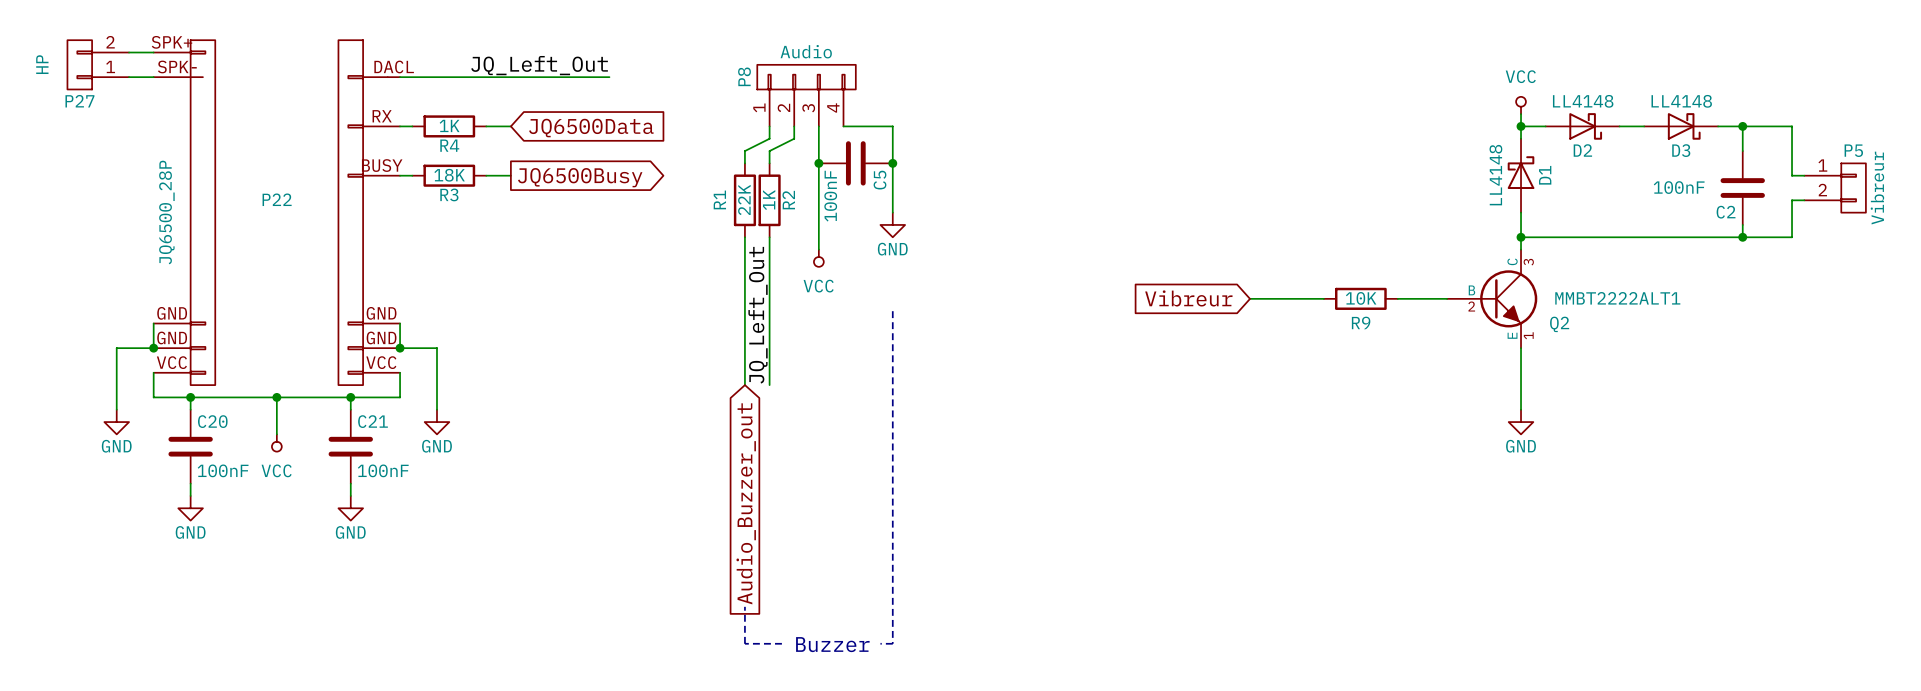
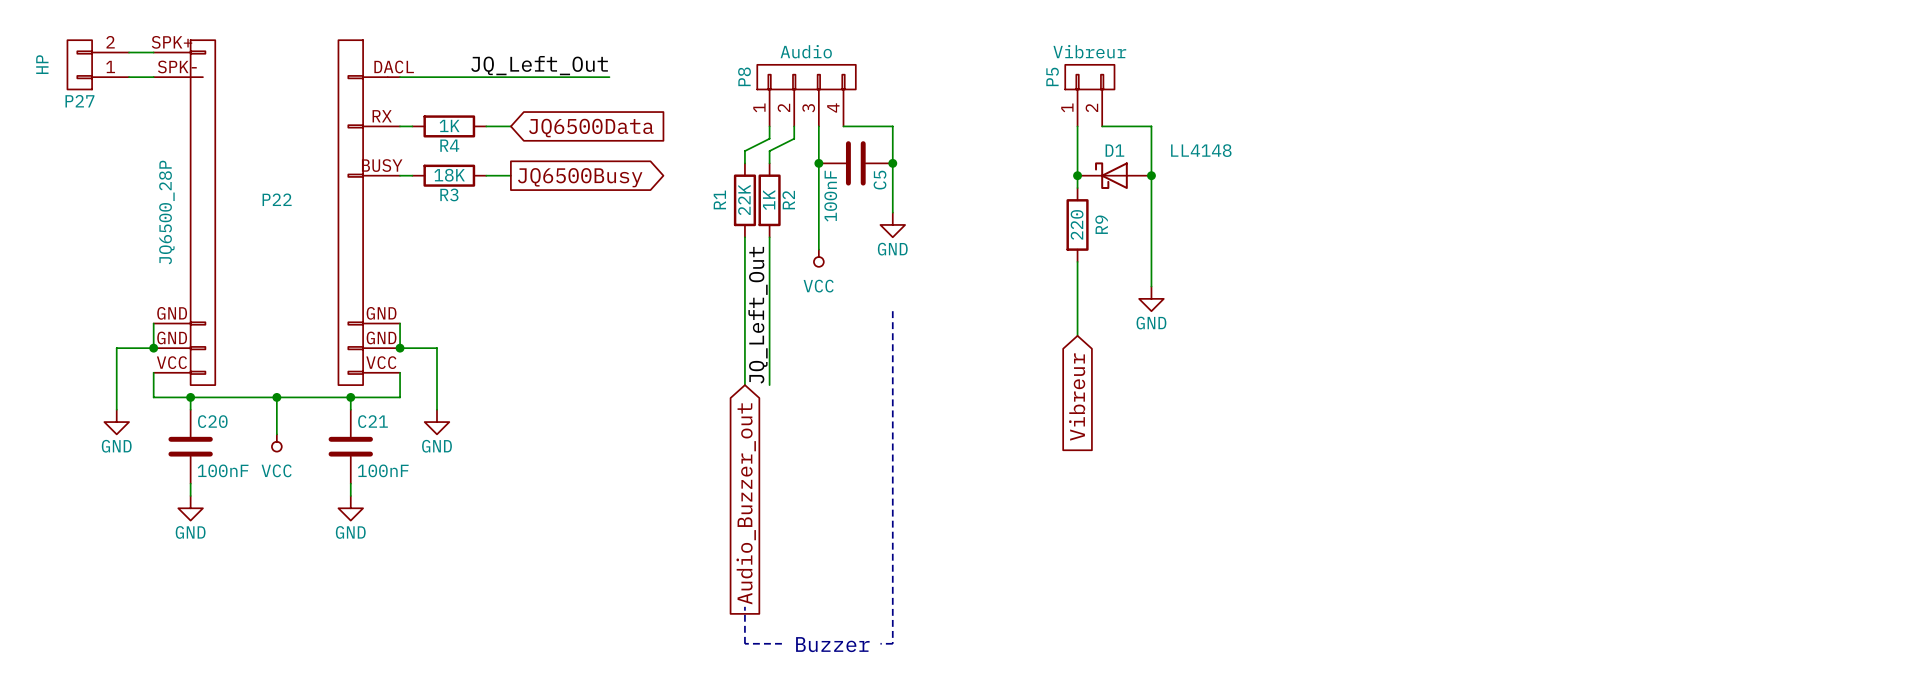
power symbol: VCC (1521, 105) -> none
wire: (1521, 114) (1521, 138) -> none
wire: none -> (1077, 126) (1077, 188)
wire: none -> (1102, 126) (1151, 126) (1151, 286)
wire: (1521, 126) (1545, 126) -> none
junction: (1521, 126) -> none
D2: LL4148 (1582, 126) -> none
wire: (1619, 126) (1644, 126) -> none
D3: LL4148 (1681, 126) -> none
wire: (1718, 126) (1792, 126) (1792, 175) (1804, 175) -> none
wire: (1742, 126) (1742, 151) -> none
junction: (1742, 126) -> none
D1 rotation: 0° (1521, 172) -> 90° counterclockwise (1111, 175)
junction: none -> (1077, 175)
junction: none -> (1151, 175)
D1 value position: LL4148 (1495, 175) -> LL4148 (1201, 150)
D1 position: (1521, 175) -> (1114, 175)
C2: 100nF (1742, 188) -> none
P5 position: (1835, 188) -> (1089, 95)
P5 rotation: 0° (1853, 188) -> 90° counterclockwise (1089, 77)
wire: (1804, 200) (1792, 200) (1792, 237) (1521, 237) -> none
wire: (1521, 212) (1521, 249) -> none
wire: (1742, 224) (1742, 237) -> none
junction: (1521, 237) -> none
junction: (1742, 237) -> none
wire: none -> (1077, 261) (1077, 335)
power symbol: none -> GND (1151, 298)
global label rotation: 0° (1188, 298) -> 90° counterclockwise (1077, 396)
global label position: Vibreur (1188, 298) -> Vibreur (1077, 396)
wire: (1250, 298) (1323, 298) -> none
R9 rotation: 0° (1360, 298) -> 90° clockwise (1077, 224)
R9 position: (1360, 298) -> (1077, 224)
R9 value: 10K (1361, 298) -> 220 (1077, 224)
wire: (1397, 298) (1447, 298) -> none
Q2: MMBT2222ALT1 (1492, 298) -> none
R9 name position: R9 (1361, 322) -> R9 (1101, 224)
wire: (1521, 348) (1521, 409) -> none
power symbol: GND (1521, 422) -> none

